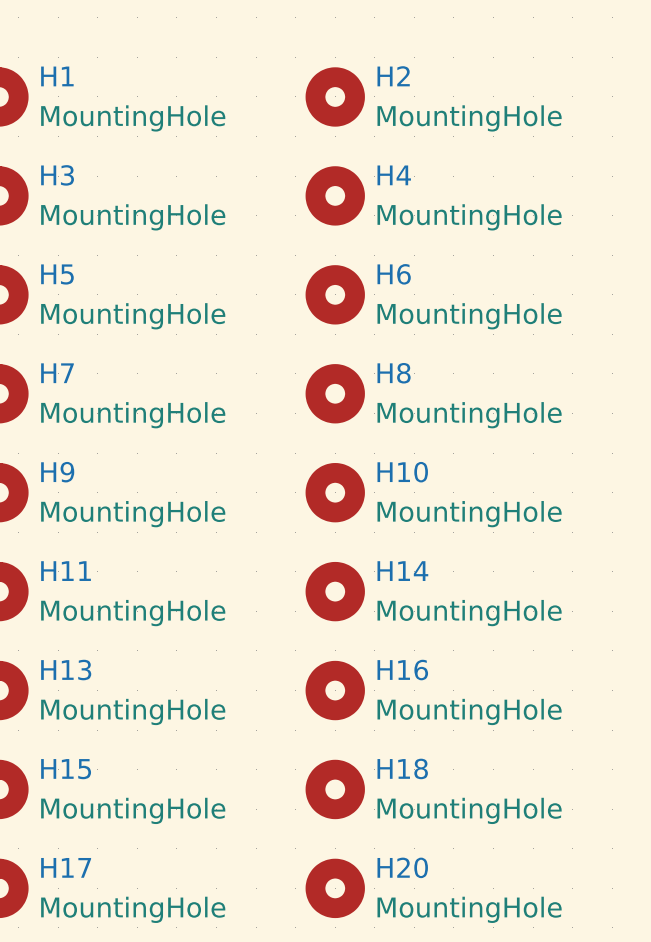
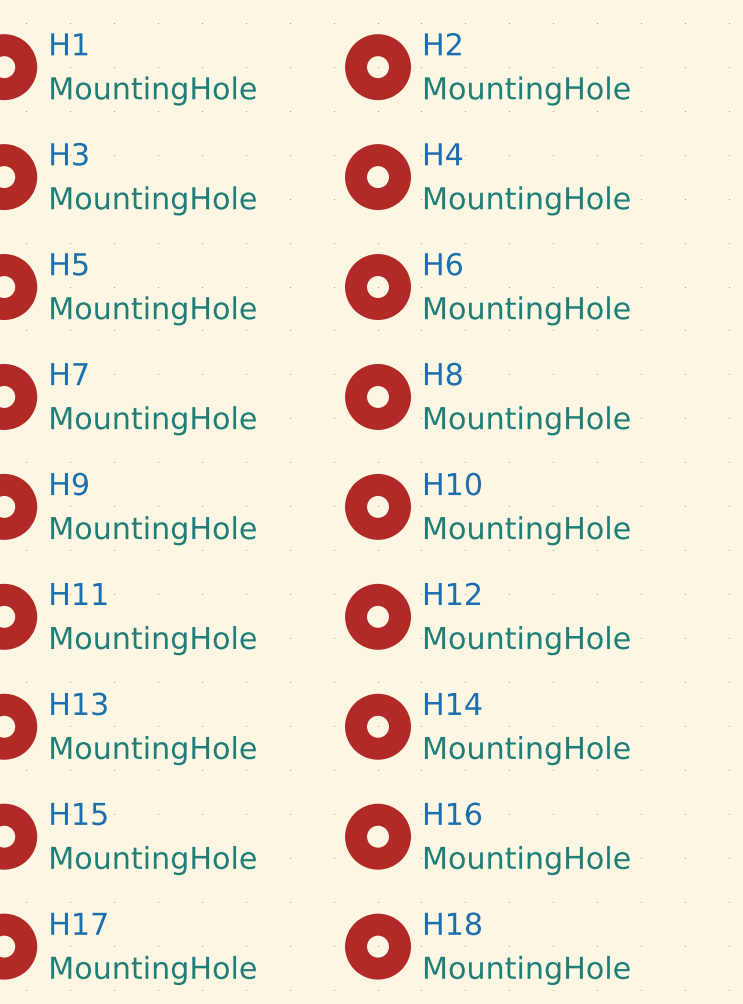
H14 name: H14 (402, 571) -> H12 (452, 593)
H16 name: H16 (402, 670) -> H14 (453, 703)
H18 name: H18 (402, 768) -> H16 (453, 813)
H20 name: H20 (402, 867) -> H18 (452, 923)

